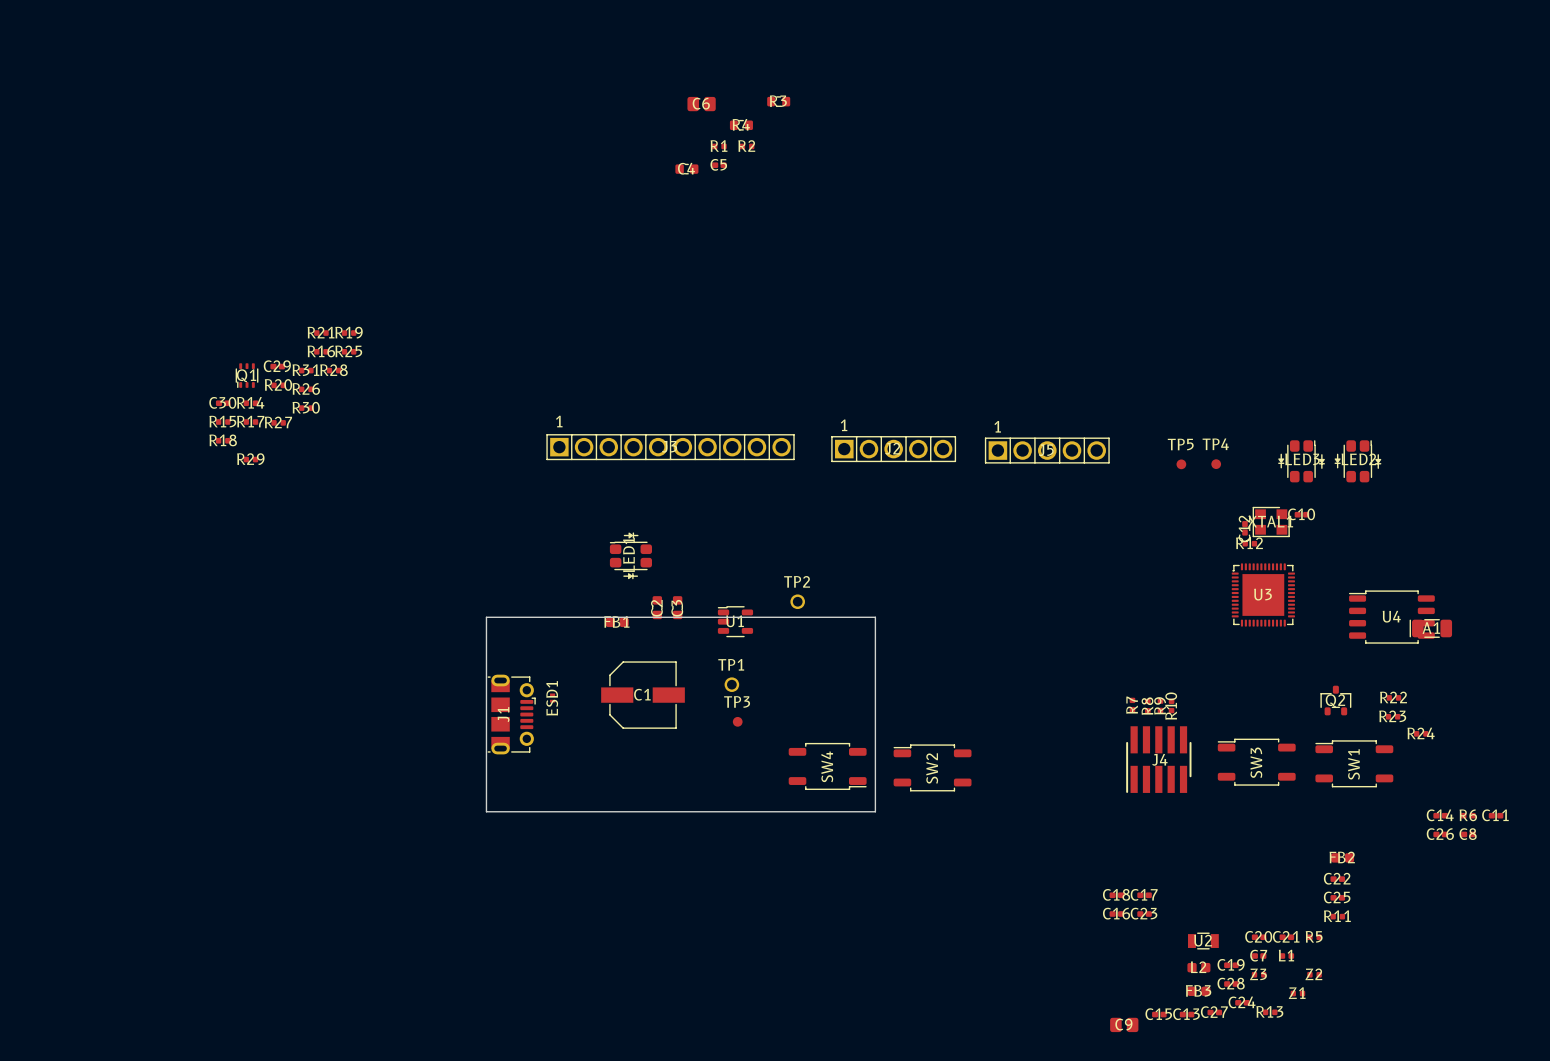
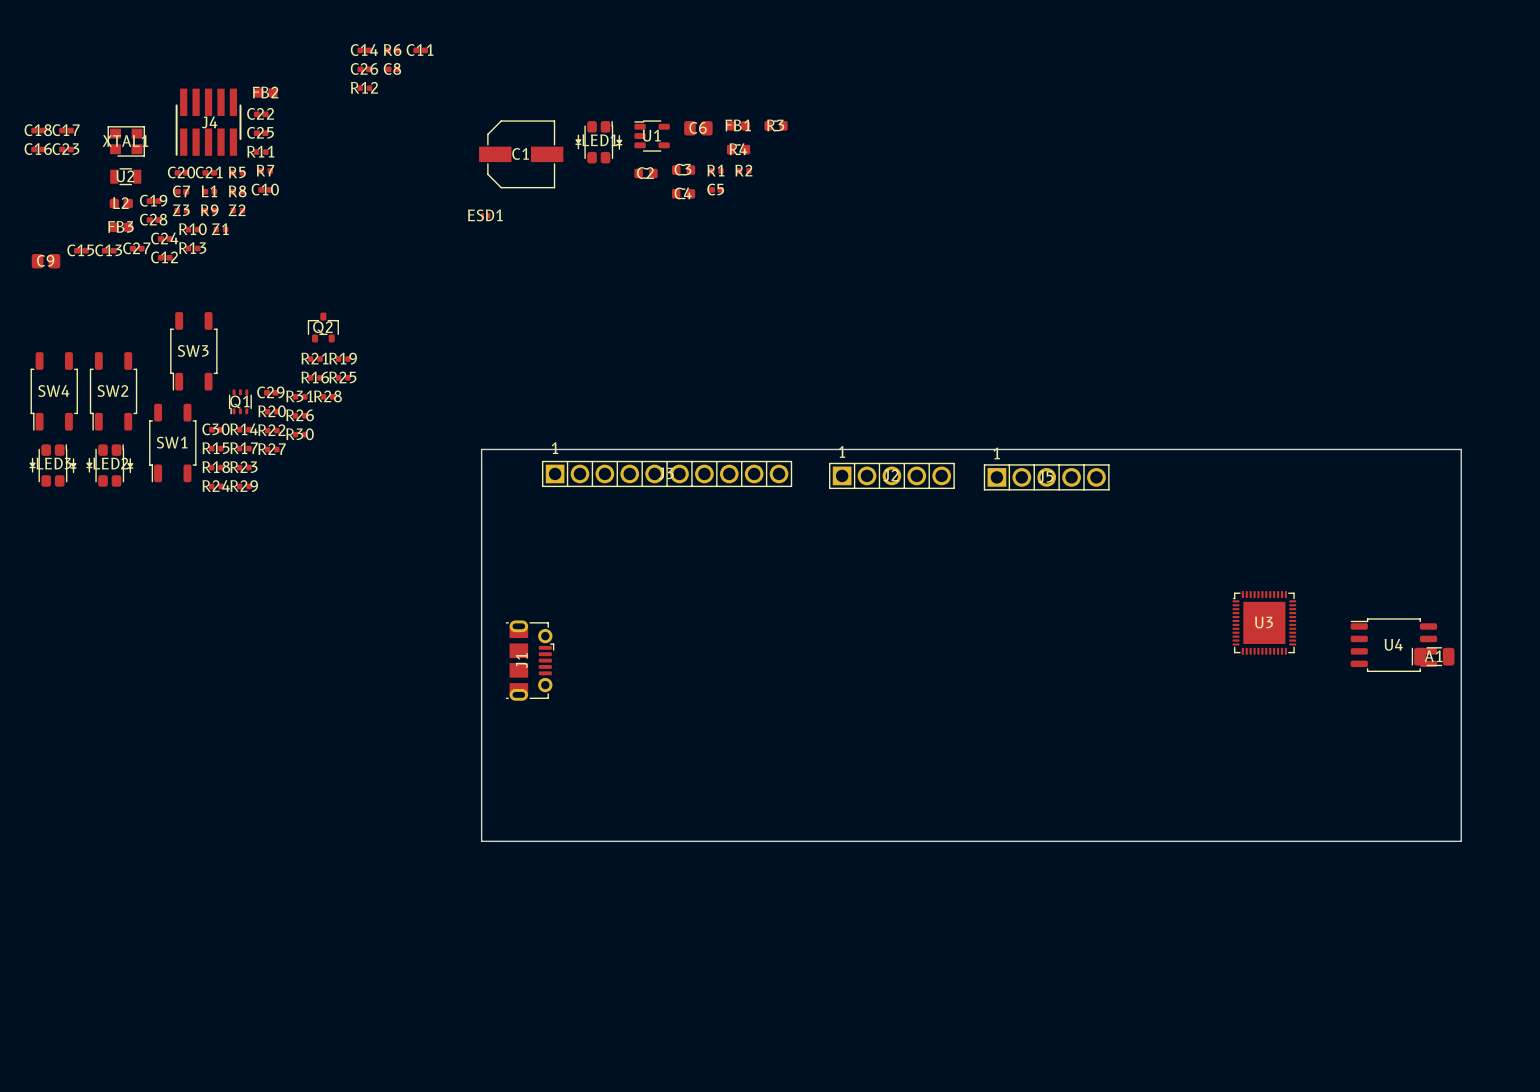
LED3 position: (1301, 461) -> (53, 465)
LED2 position: (1357, 461) -> (109, 465)
TP5: (1181, 464) -> none
TP4: (1216, 464) -> none
C10 position: (1301, 514) -> (265, 189)
XTAL1 rotation: 0° (1271, 522) -> 180° (126, 141)
XTAL1 position: (1271, 522) -> (126, 141)
C12 rotation: 0° (1244, 528) -> 90° clockwise (165, 257)
C12 position: (1244, 528) -> (165, 257)
R12 position: (1249, 543) -> (364, 88)
LED1 rotation: 0° (630, 555) -> 90° clockwise (598, 142)
LED1 position: (630, 555) -> (598, 142)
TP2: (797, 601) -> none
C2 rotation: 0° (657, 607) -> 90° clockwise (646, 173)
C2 position: (657, 607) -> (646, 173)
C3 rotation: 0° (677, 607) -> 90° clockwise (683, 170)
C3 position: (677, 607) -> (683, 170)
board edge: (486, 617) (875, 617) (875, 811) -> (481, 645) (481, 449) (1461, 449) (1461, 841) (873, 841)
U1 position: (735, 621) -> (652, 136)
FB1 position: (617, 622) -> (738, 125)
TP1: (731, 684) -> none
C1 position: (643, 695) -> (521, 154)
R22 position: (1393, 697) -> (272, 430)
ESD1 rotation: 0° (552, 698) -> 90° clockwise (485, 215)
ESD1 position: (552, 698) -> (485, 215)
Q2 position: (1335, 700) -> (323, 327)
R7 rotation: 0° (1132, 705) -> 90° clockwise (265, 171)
R7 position: (1132, 705) -> (265, 171)
R9 rotation: 0° (1160, 705) -> 90° clockwise (209, 210)
R9 position: (1160, 705) -> (209, 210)
R10 rotation: 0° (1171, 705) -> 90° clockwise (193, 229)
R10 position: (1171, 705) -> (193, 229)
R8 rotation: 0° (1147, 706) -> 90° clockwise (237, 191)
R8 position: (1147, 706) -> (237, 191)
J1 position: (511, 714) -> (530, 660)
R23 position: (1393, 716) -> (244, 467)
TP3: (737, 721) -> none
R24 position: (1421, 733) -> (216, 486)
J4 position: (1158, 759) -> (208, 122)
SW3 rotation: 0° (1256, 762) -> 90° counterclockwise (193, 351)
SW3 position: (1256, 762) -> (193, 351)
SW1 rotation: 0° (1354, 763) -> 90° counterclockwise (172, 443)
SW1 position: (1354, 763) -> (172, 443)
SW4 rotation: 0° (827, 766) -> 90° clockwise (54, 391)
SW4 position: (827, 766) -> (54, 391)
SW2 rotation: 0° (932, 767) -> 90° counterclockwise (113, 391)
SW2 position: (932, 767) -> (113, 391)
C14 position: (1440, 815) -> (364, 50)
R6 position: (1468, 815) -> (392, 50)
C11 position: (1496, 815) -> (420, 50)
C26 position: (1440, 834) -> (364, 69)
C8 position: (1468, 834) -> (392, 69)
FB2 position: (1342, 857) -> (265, 92)
C22 position: (1337, 879) -> (261, 114)
C18 position: (1116, 895) -> (38, 130)
C17 position: (1144, 895) -> (66, 130)
C25 position: (1337, 897) -> (261, 133)
C16 position: (1116, 914) -> (38, 149)
C23 position: (1144, 914) -> (66, 149)
R11 position: (1337, 916) -> (261, 152)
C20 position: (1259, 937) -> (181, 172)
C21 position: (1286, 937) -> (209, 172)
R5 position: (1314, 937) -> (237, 172)
U2 position: (1203, 941) -> (125, 176)
C7 position: (1259, 956) -> (181, 191)
L1 position: (1286, 956) -> (209, 191)
C19 position: (1231, 965) -> (153, 201)
L2 position: (1198, 967) -> (121, 203)
Z3 position: (1259, 974) -> (181, 210)
Z2 position: (1314, 974) -> (237, 210)
C28 position: (1231, 984) -> (153, 219)
FB3 position: (1198, 991) -> (121, 227)
Z1 position: (1297, 993) -> (220, 229)
C24 position: (1242, 1002) -> (165, 238)
C27 position: (1214, 1012) -> (137, 248)
R13 position: (1270, 1012) -> (193, 248)
C15 position: (1159, 1014) -> (81, 250)
C13 position: (1187, 1014) -> (109, 250)
C9 position: (1124, 1024) -> (46, 261)

